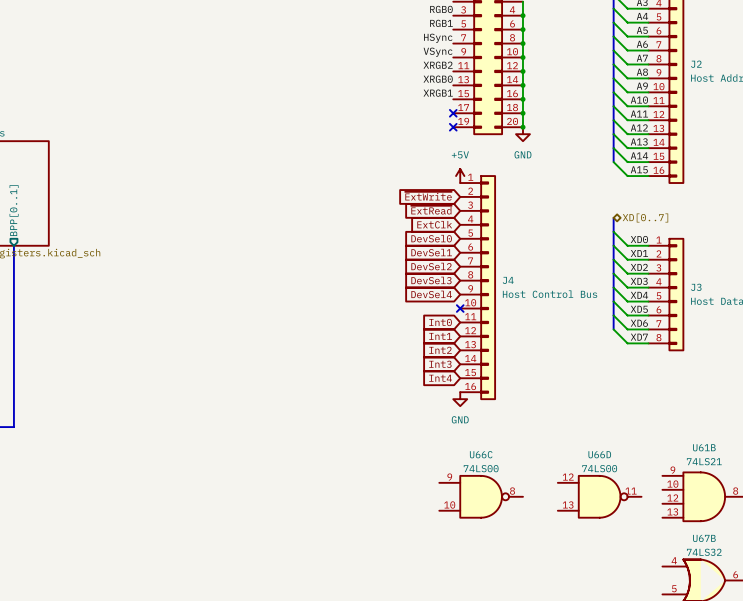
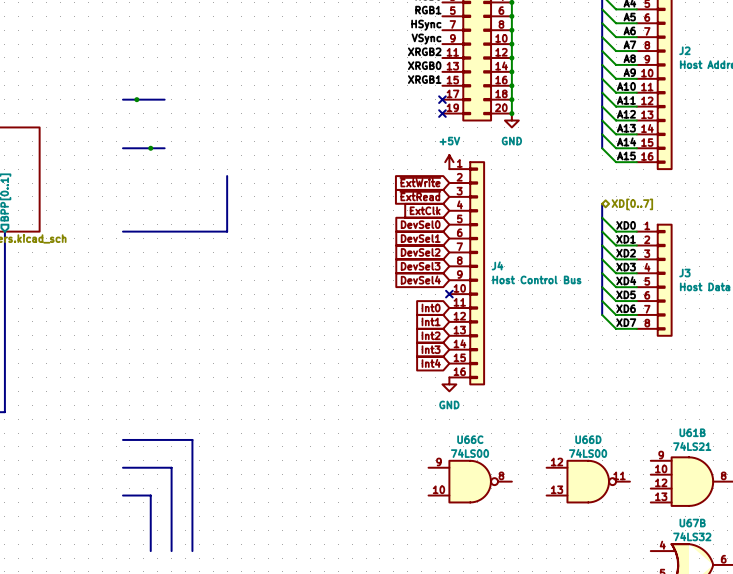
bus: none -> (122, 99) (164, 99)
junction: none -> (136, 99)
bus: none -> (122, 148) (164, 148)
junction: none -> (150, 148)
bus: none -> (227, 176) (227, 231) (122, 231)
bus: none -> (122, 439) (192, 439) (192, 551)
bus: none -> (122, 467) (171, 467) (171, 551)
bus: none -> (122, 495) (150, 495) (150, 551)

